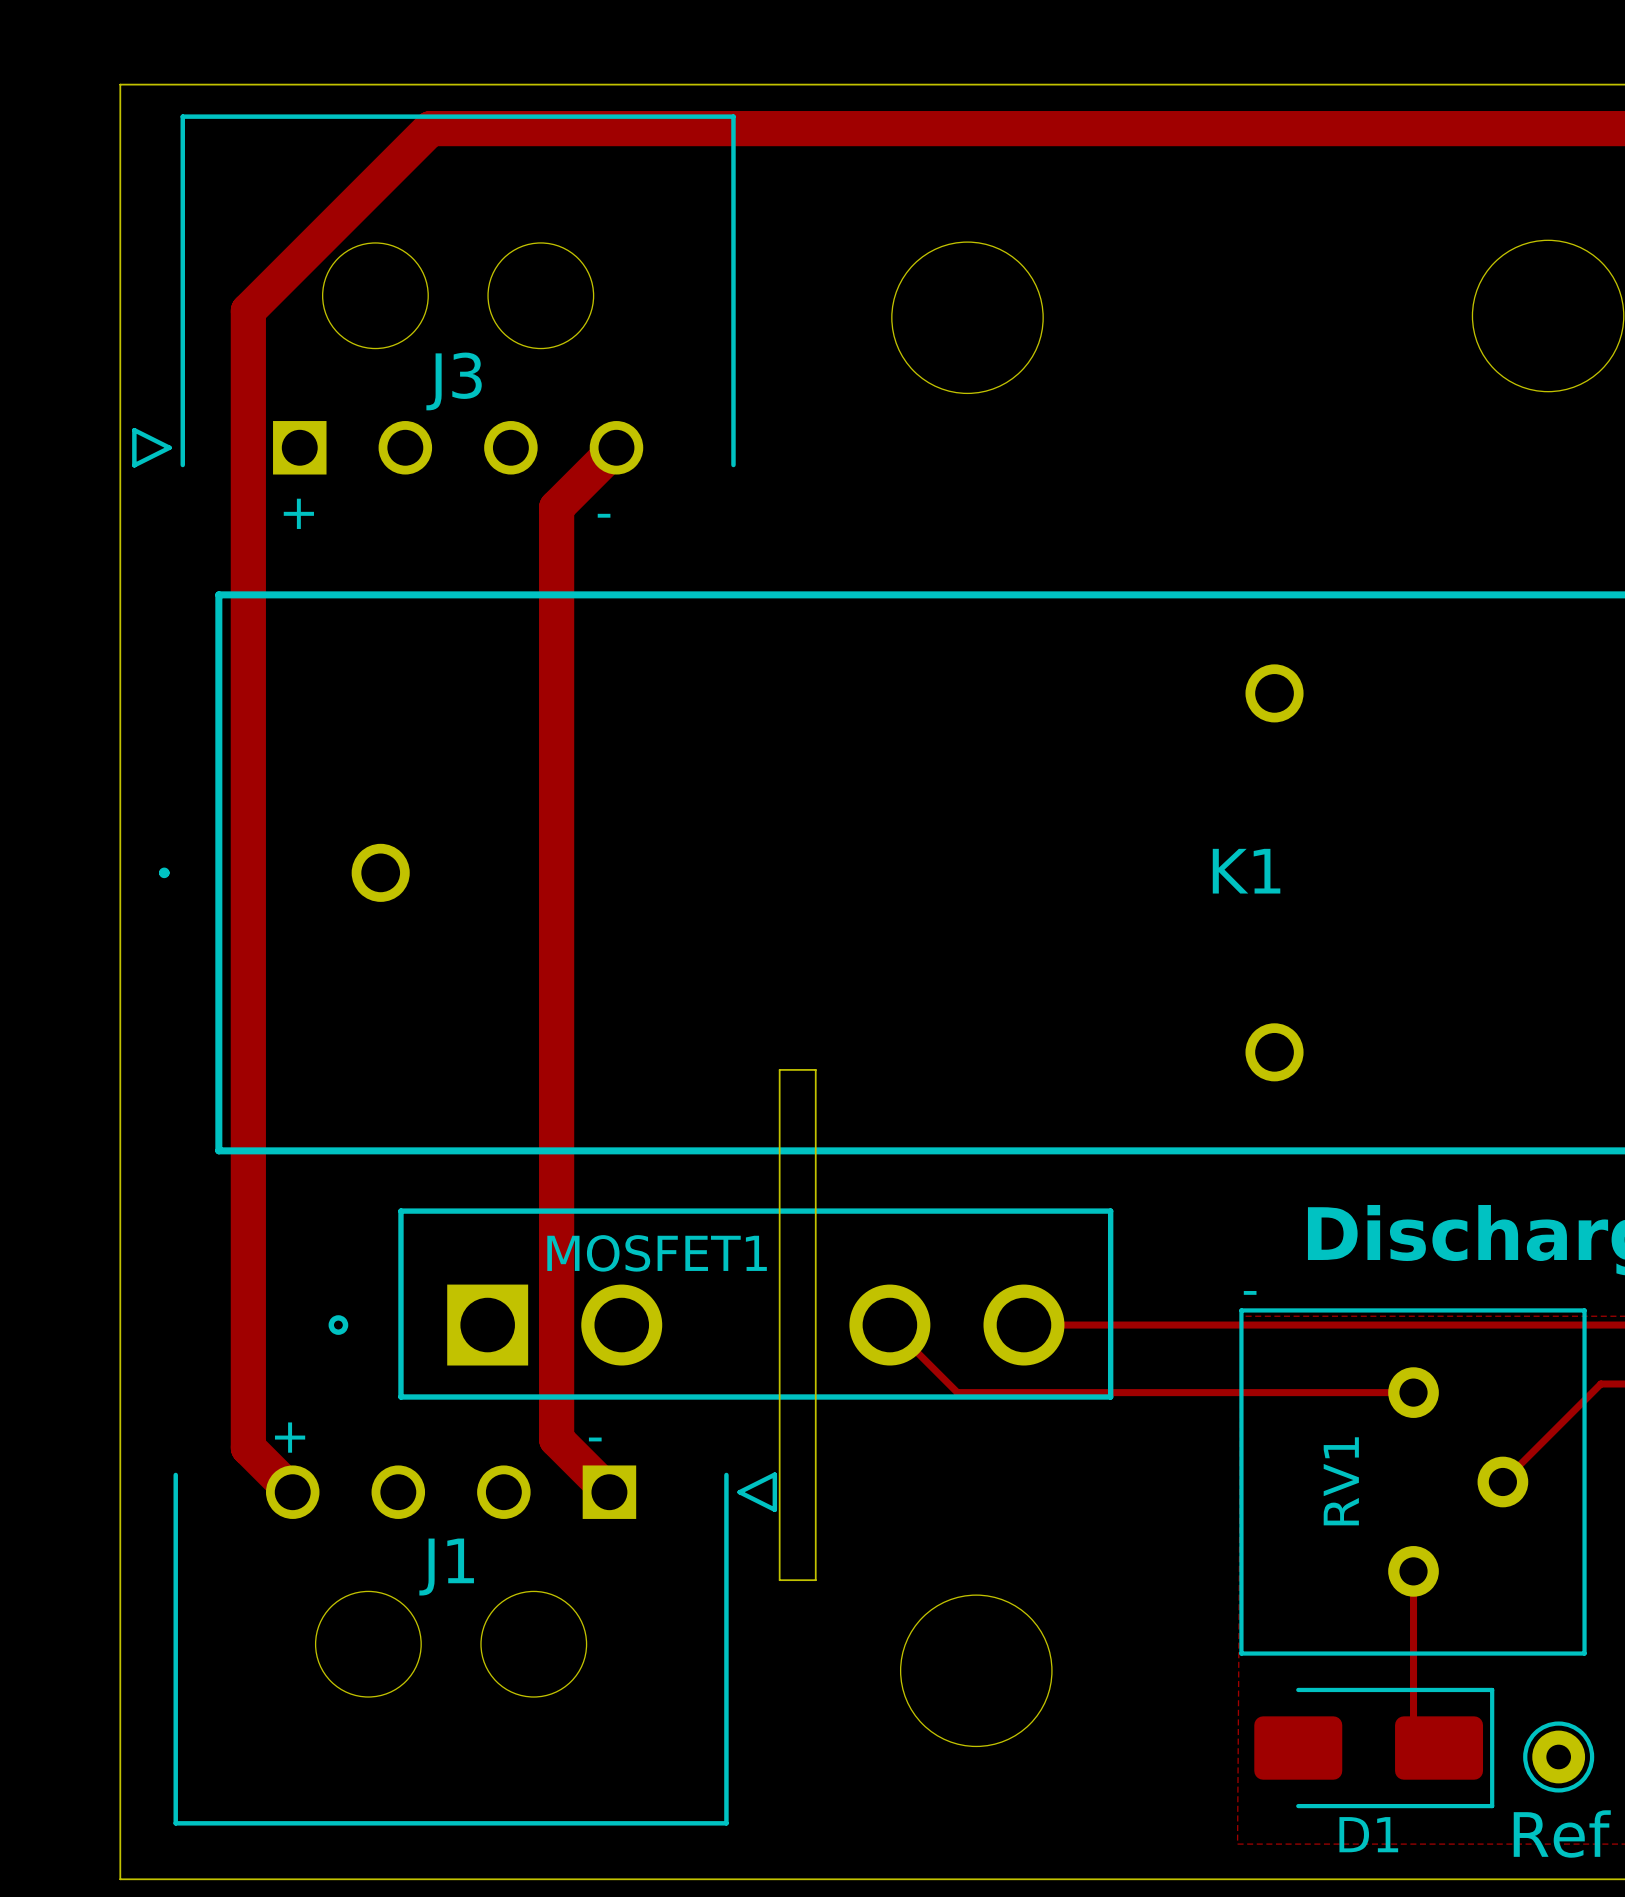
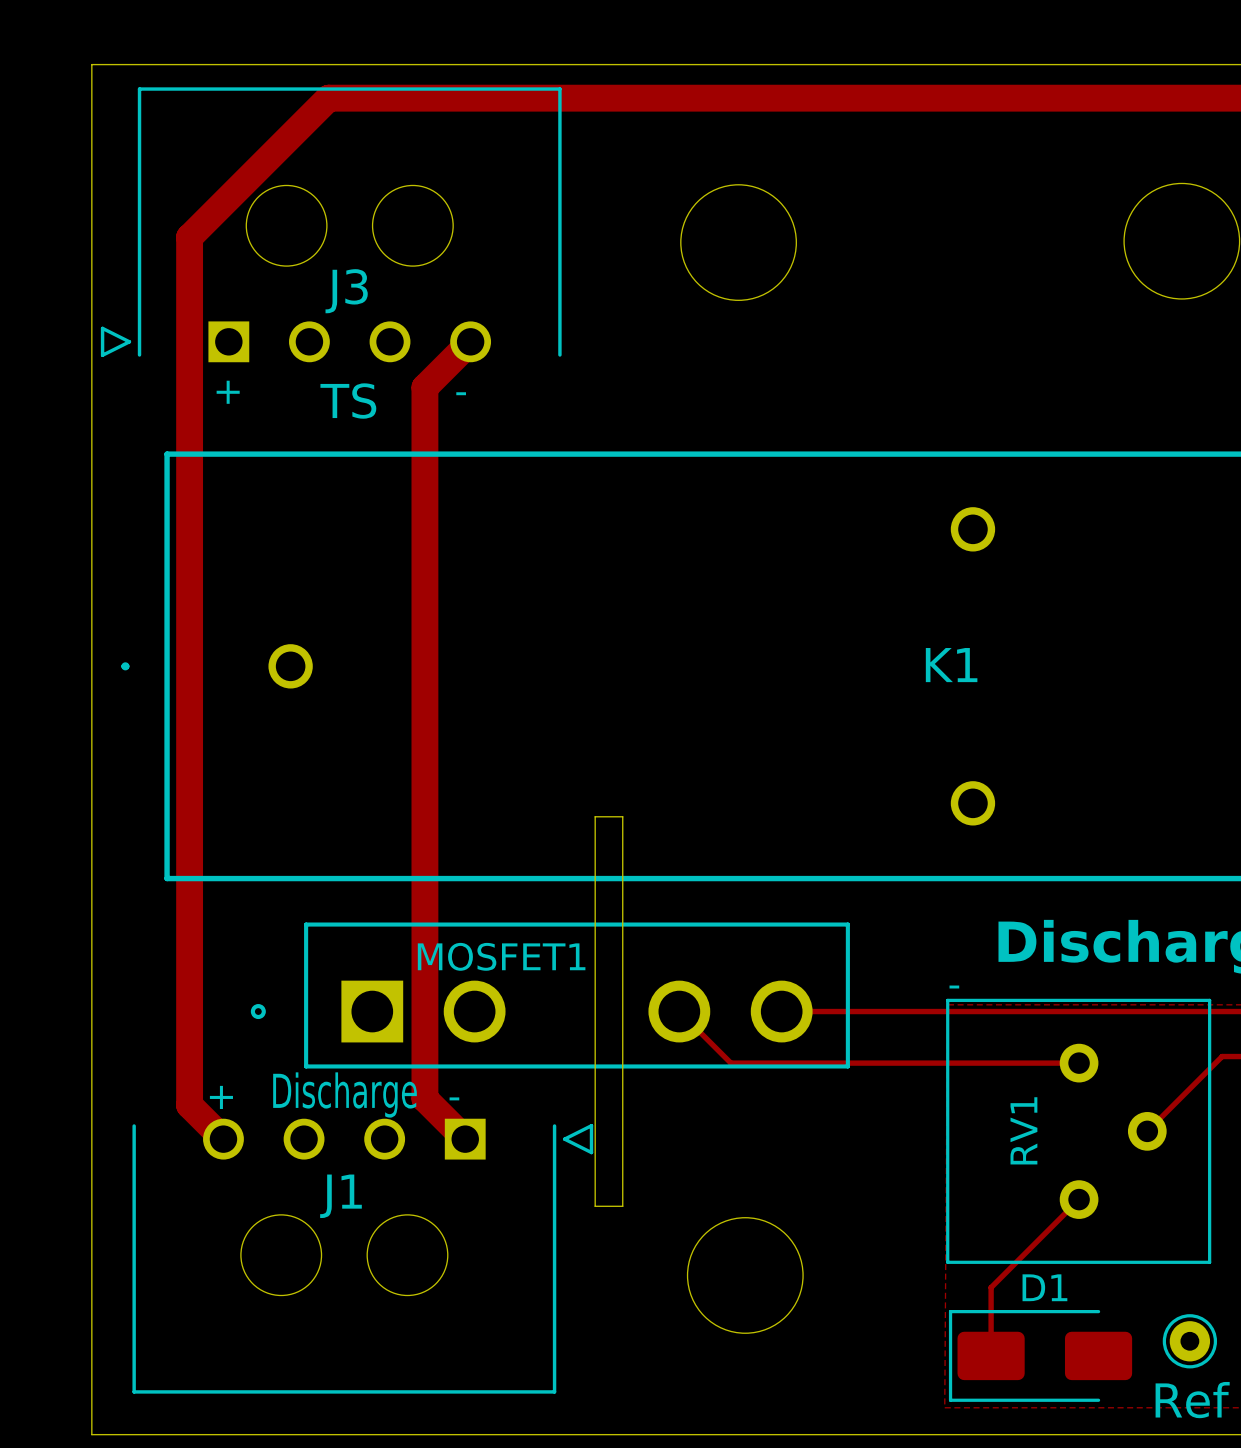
J3 text: none -> TS (348, 401)
J1 text: none -> Discharge (345, 1095)
track: (1413, 1571) (1413, 1722) (1439, 1748) -> (1079, 1199) (991, 1287) (991, 1355)
D1 rotation: 0° (1374, 1748) -> 180° (1040, 1355)

